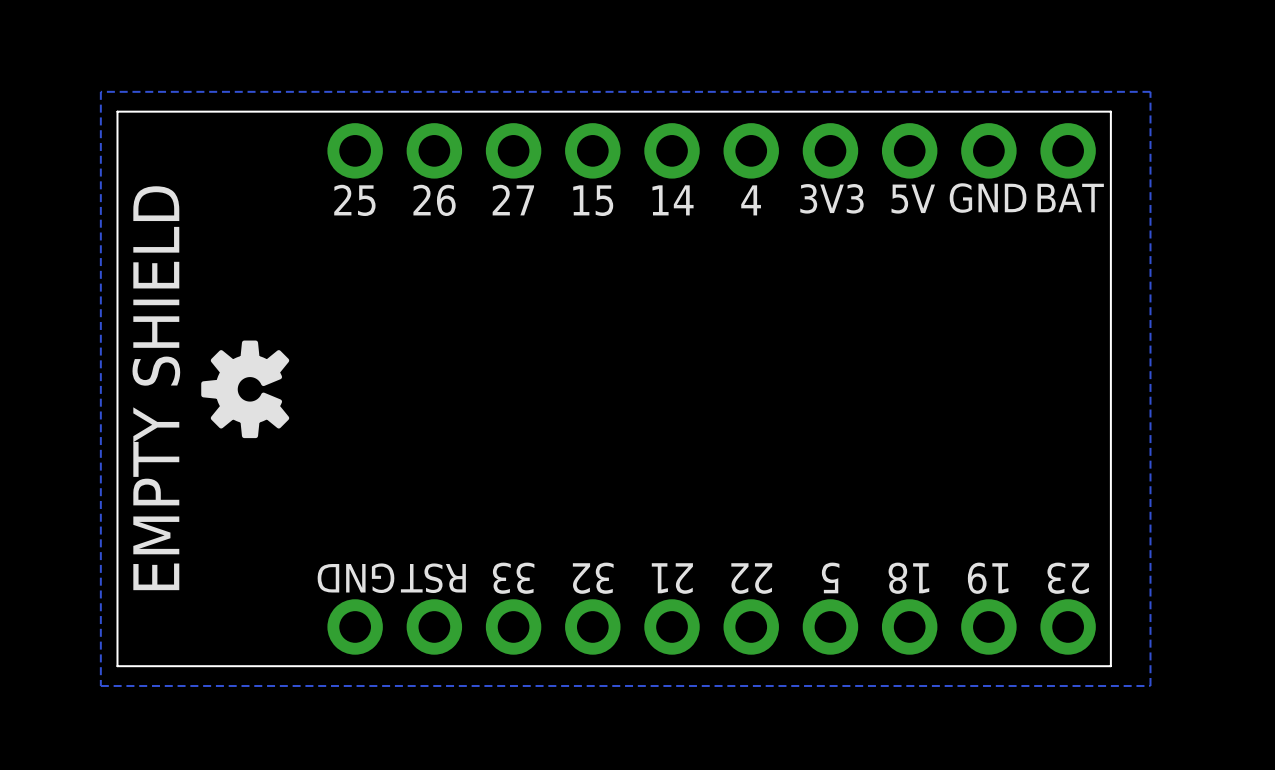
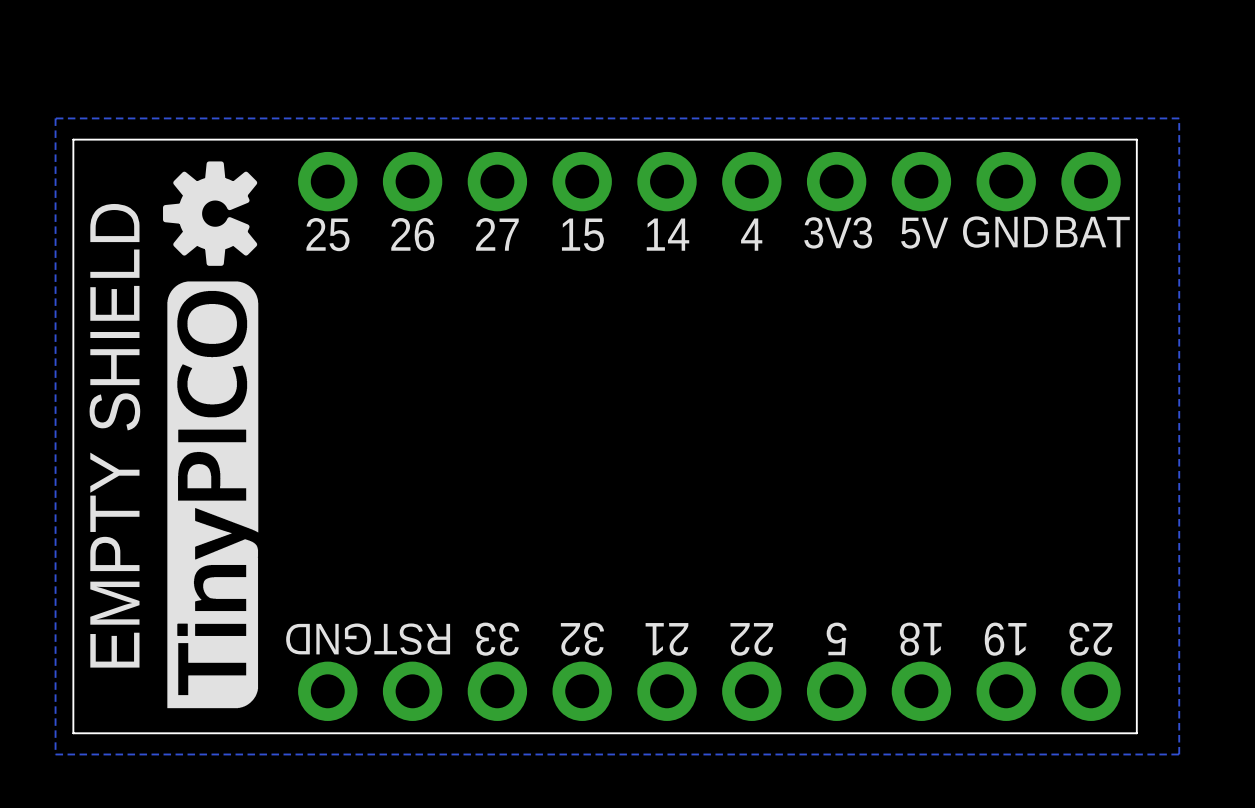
drawing: none -> [167, 281, 259, 709]
drawing position: (245, 389) -> (210, 213)

